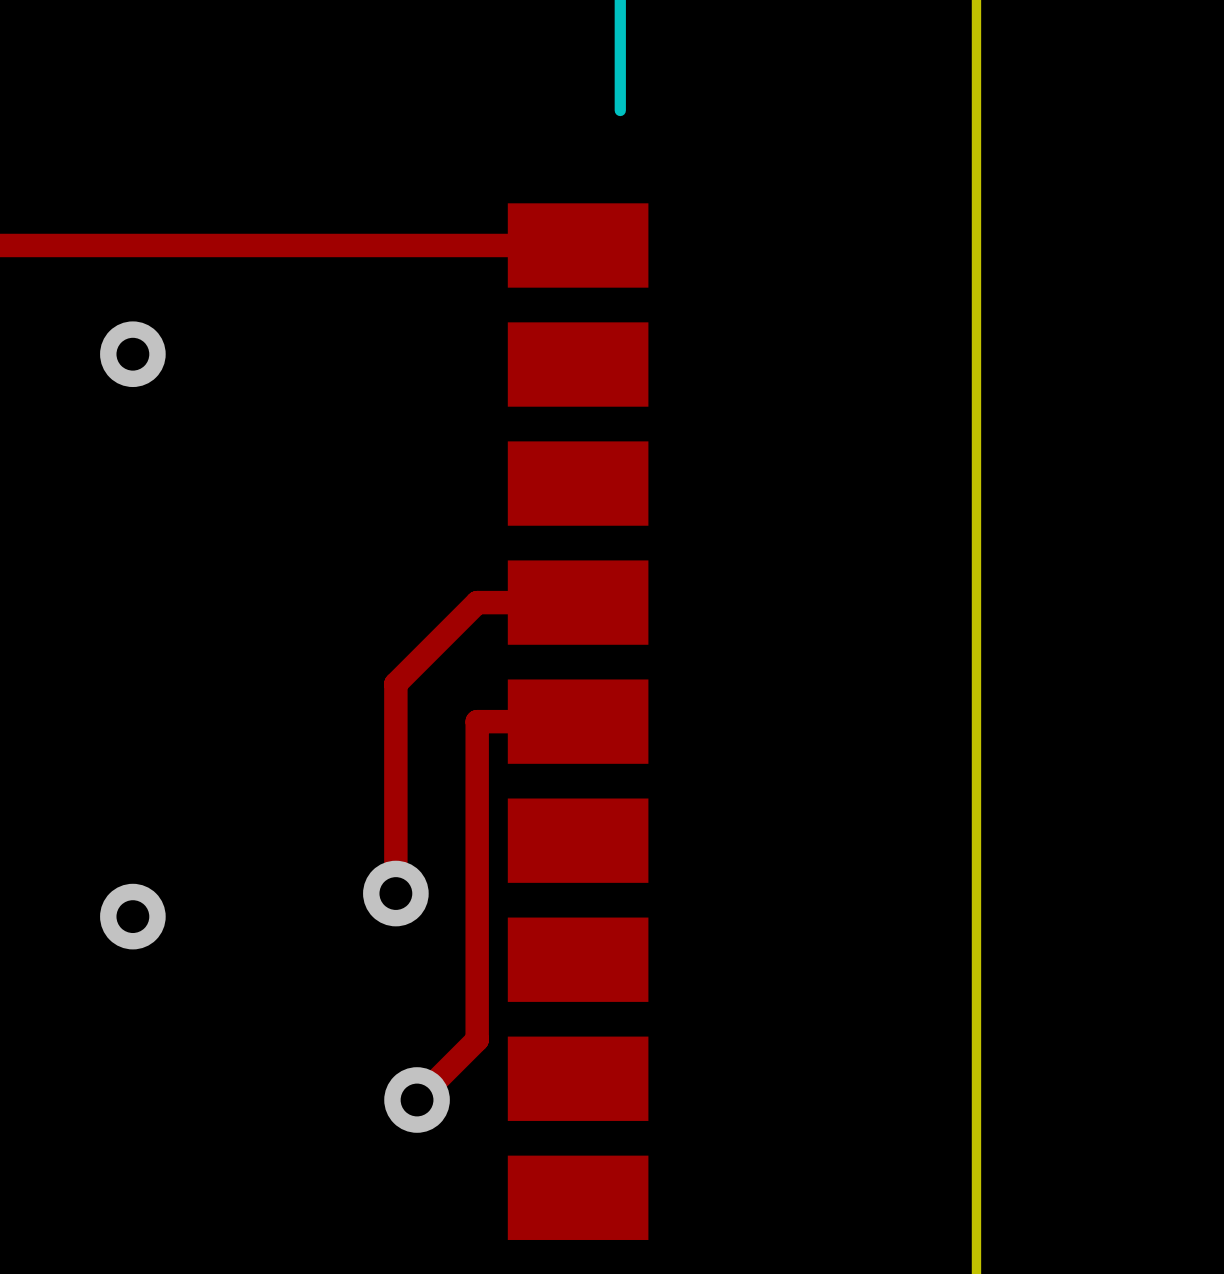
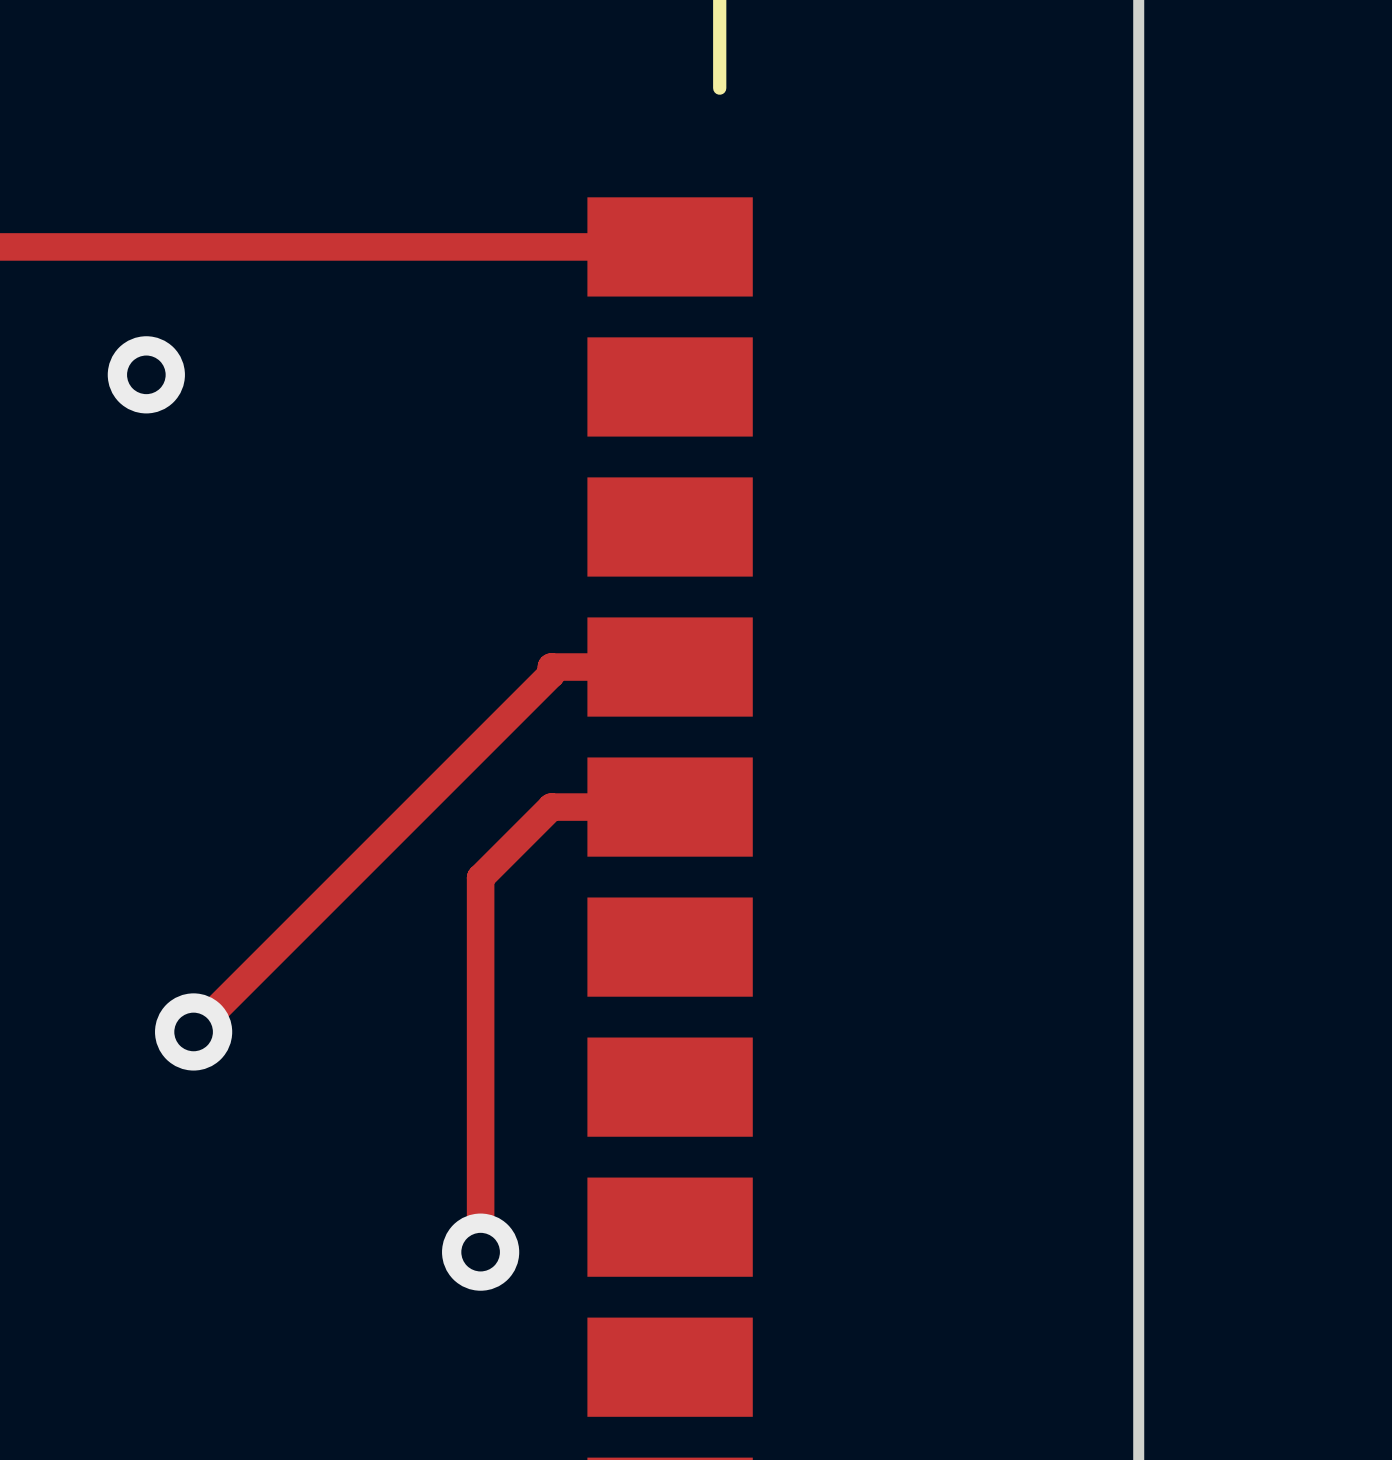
track: (477, 602) (395, 683) (395, 893) -> (551, 667) (551, 674) (193, 1031)
track: (477, 721) (477, 1039) (417, 1100) -> (551, 807) (480, 877) (480, 1252)
via: (395, 893) -> none
via position: (132, 916) -> (193, 1031)

